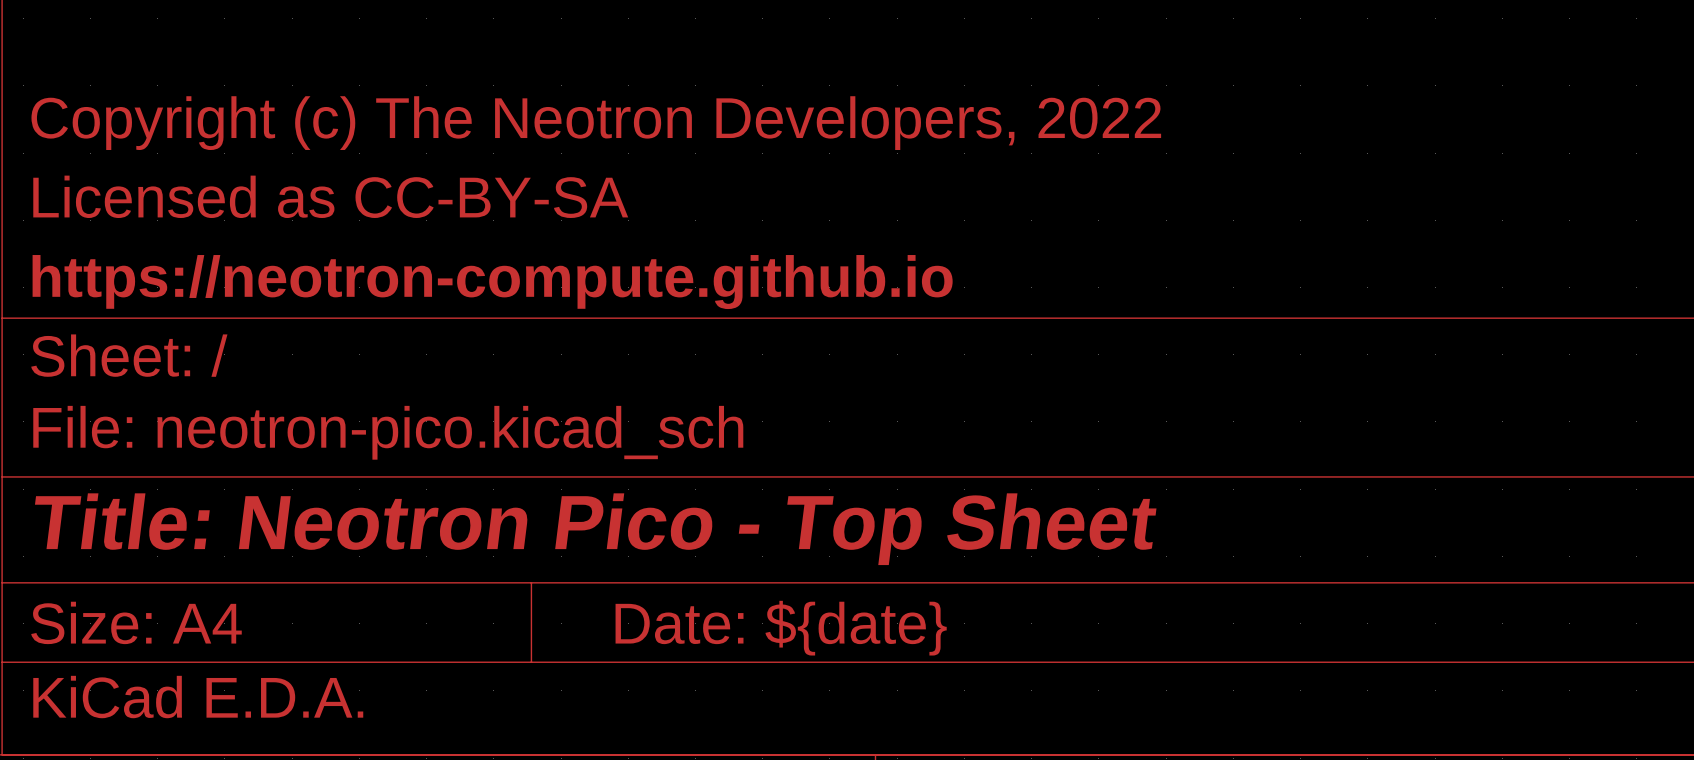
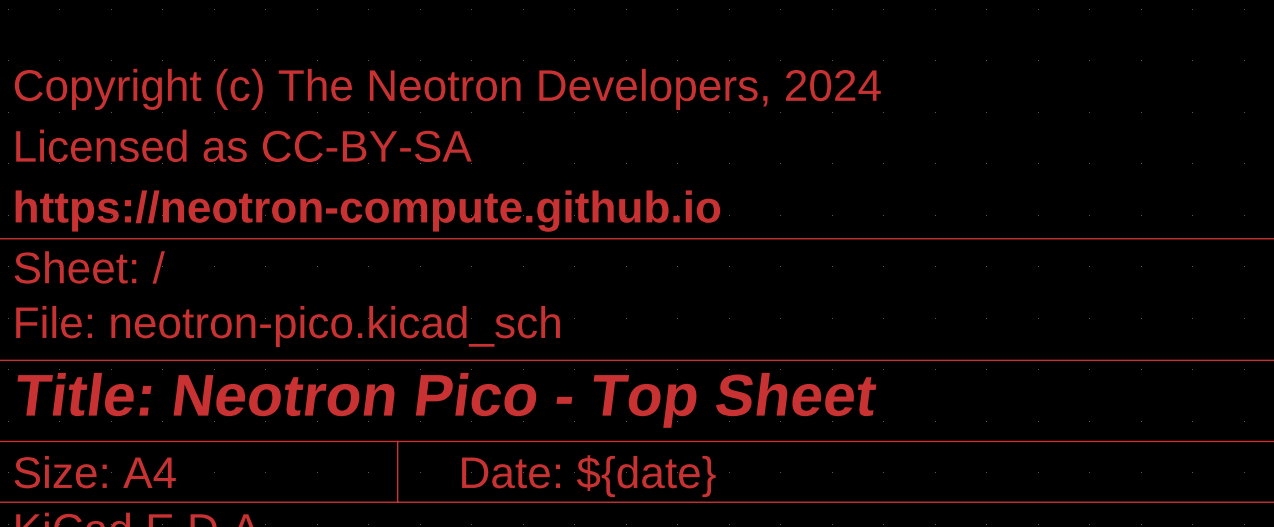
title block: Copyright (c) The Neotron Developers, 2022 (596, 123) -> Copyright (c) The Neotron Developers, 2024 (447, 89)

